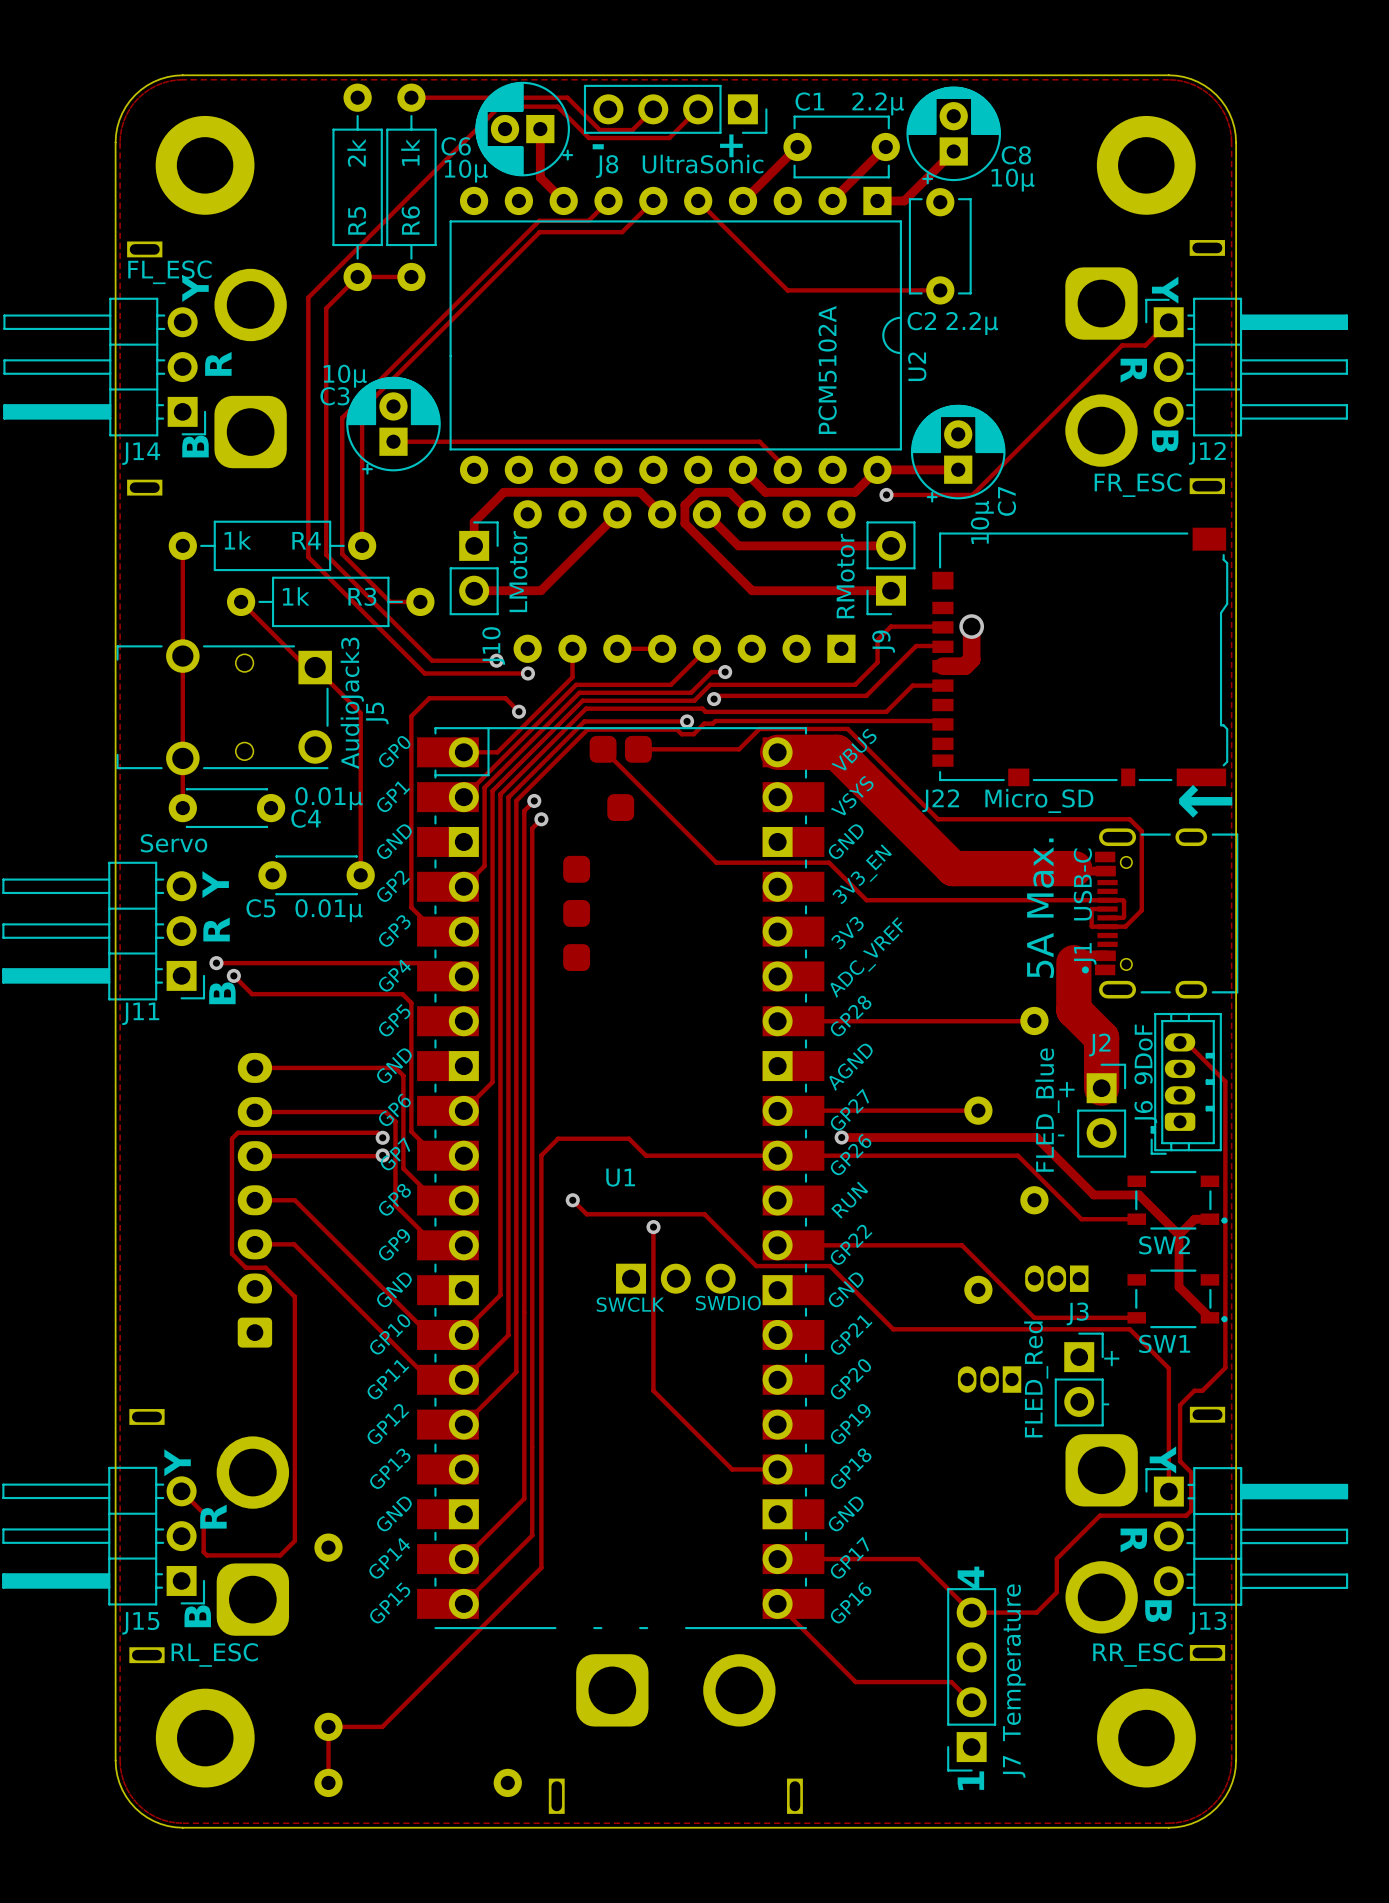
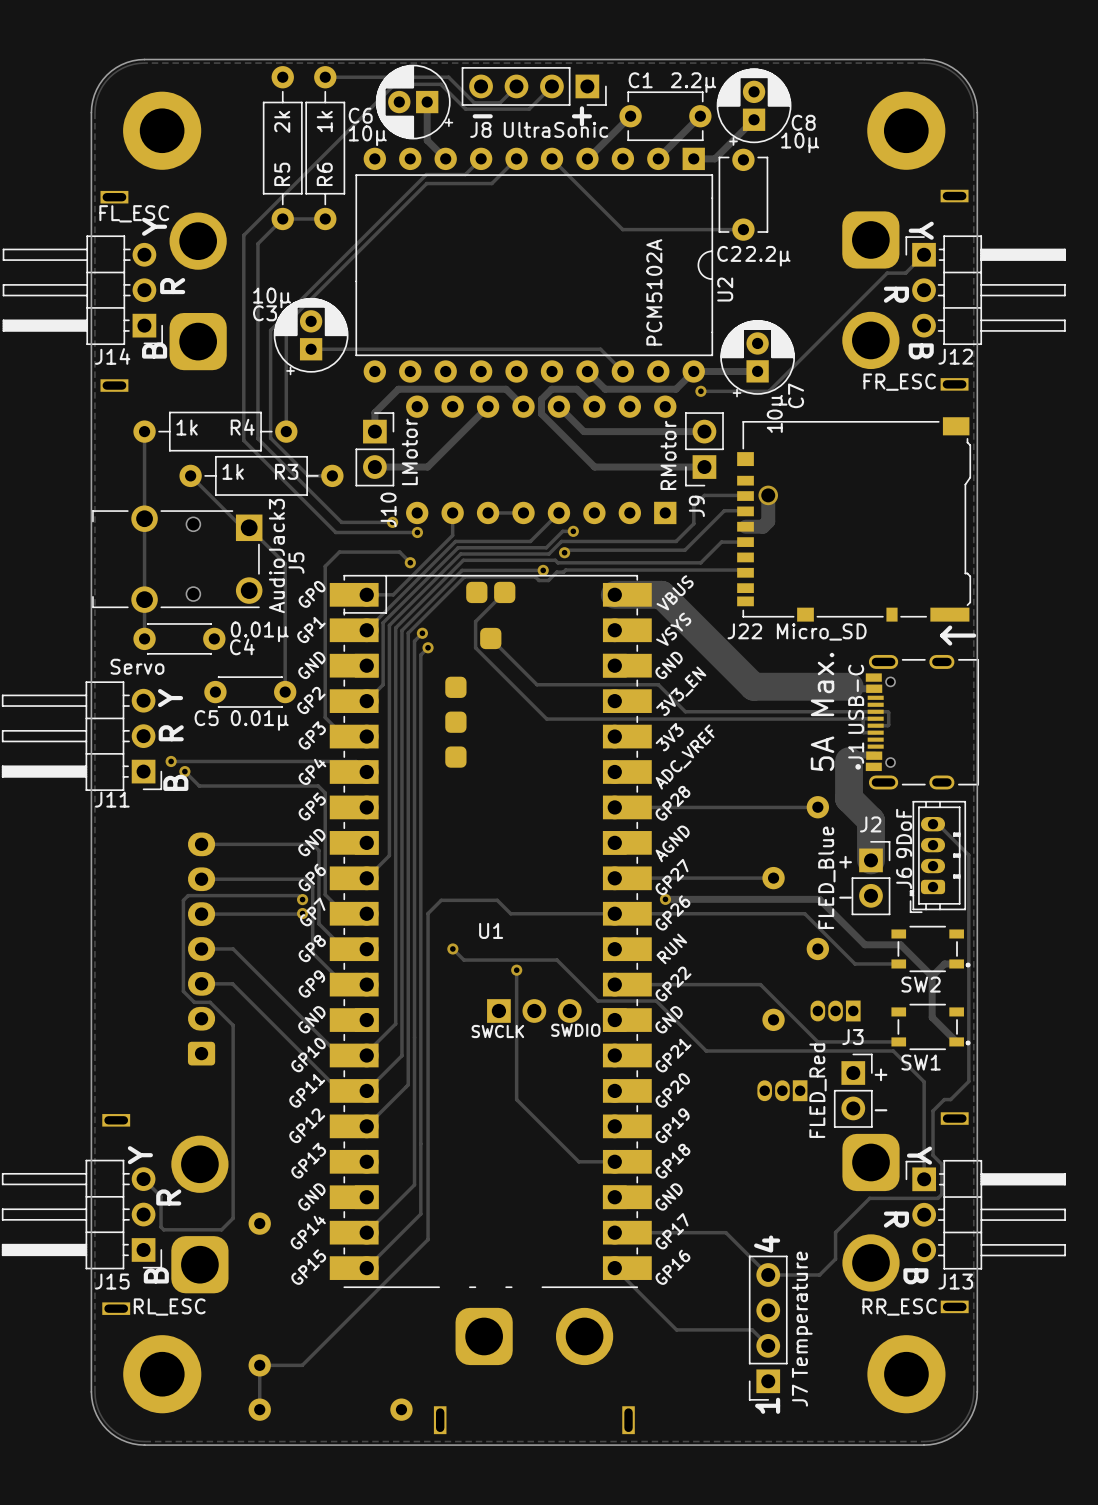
track: (603, 749) (716, 862) (829, 862) (866, 900) -> (490, 638) (537, 684) (658, 684) (685, 711)
track: (638, 749) (739, 749) (759, 728) (847, 728) (938, 819) (1129, 819) (1141, 831) (1141, 910) (1125, 926) (1107, 926) -> (504, 592) (475, 621) (475, 647) (546, 719) (863, 719)

